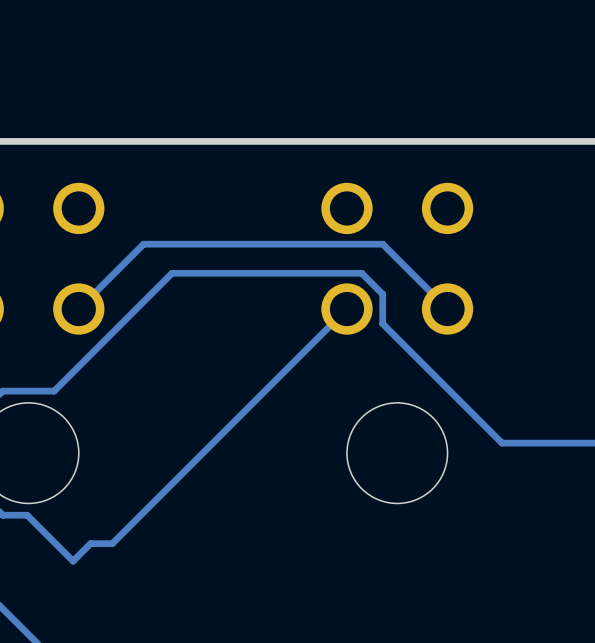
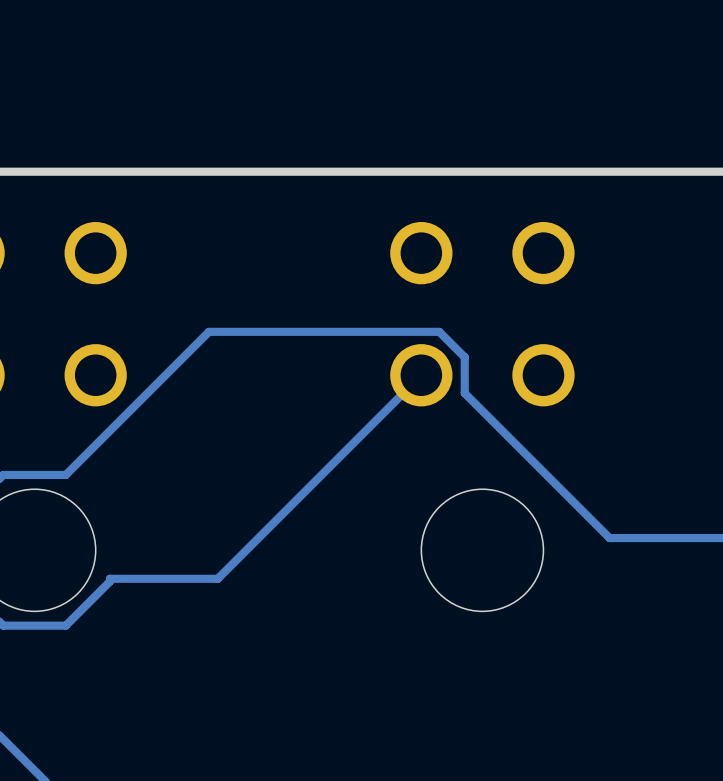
track: (447, 309) (382, 244) (143, 244) (78, 309) -> none
track: (179, 476) (112, 543) (90, 543) (73, 561) (27, 515) -> (217, 578) (109, 578) (109, 581) (65, 625) (33, 625)

